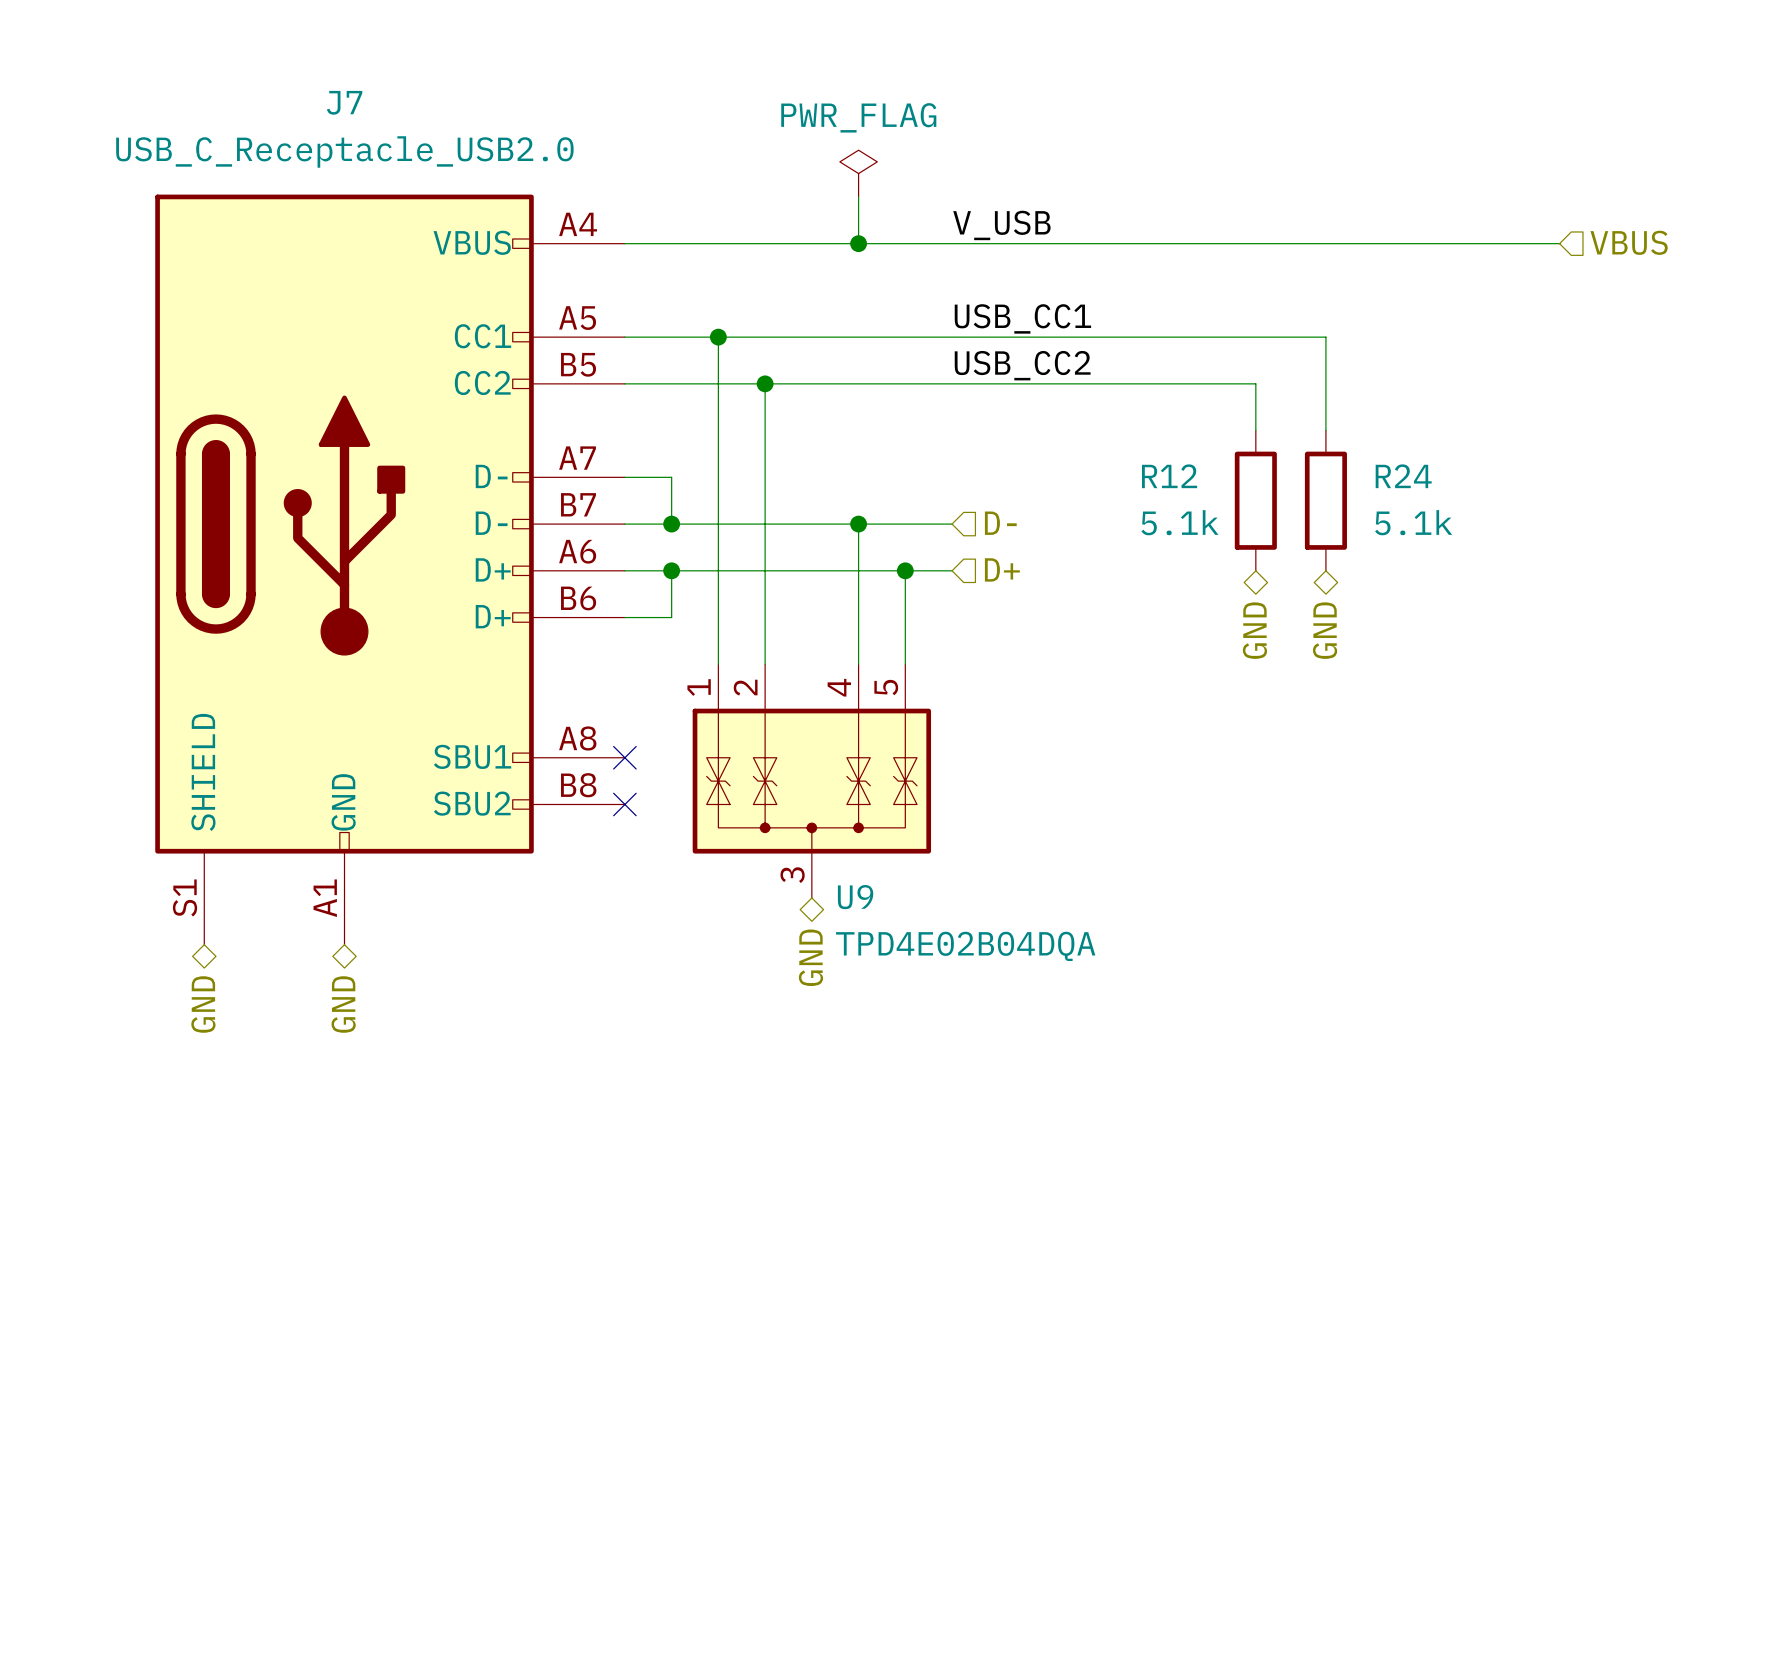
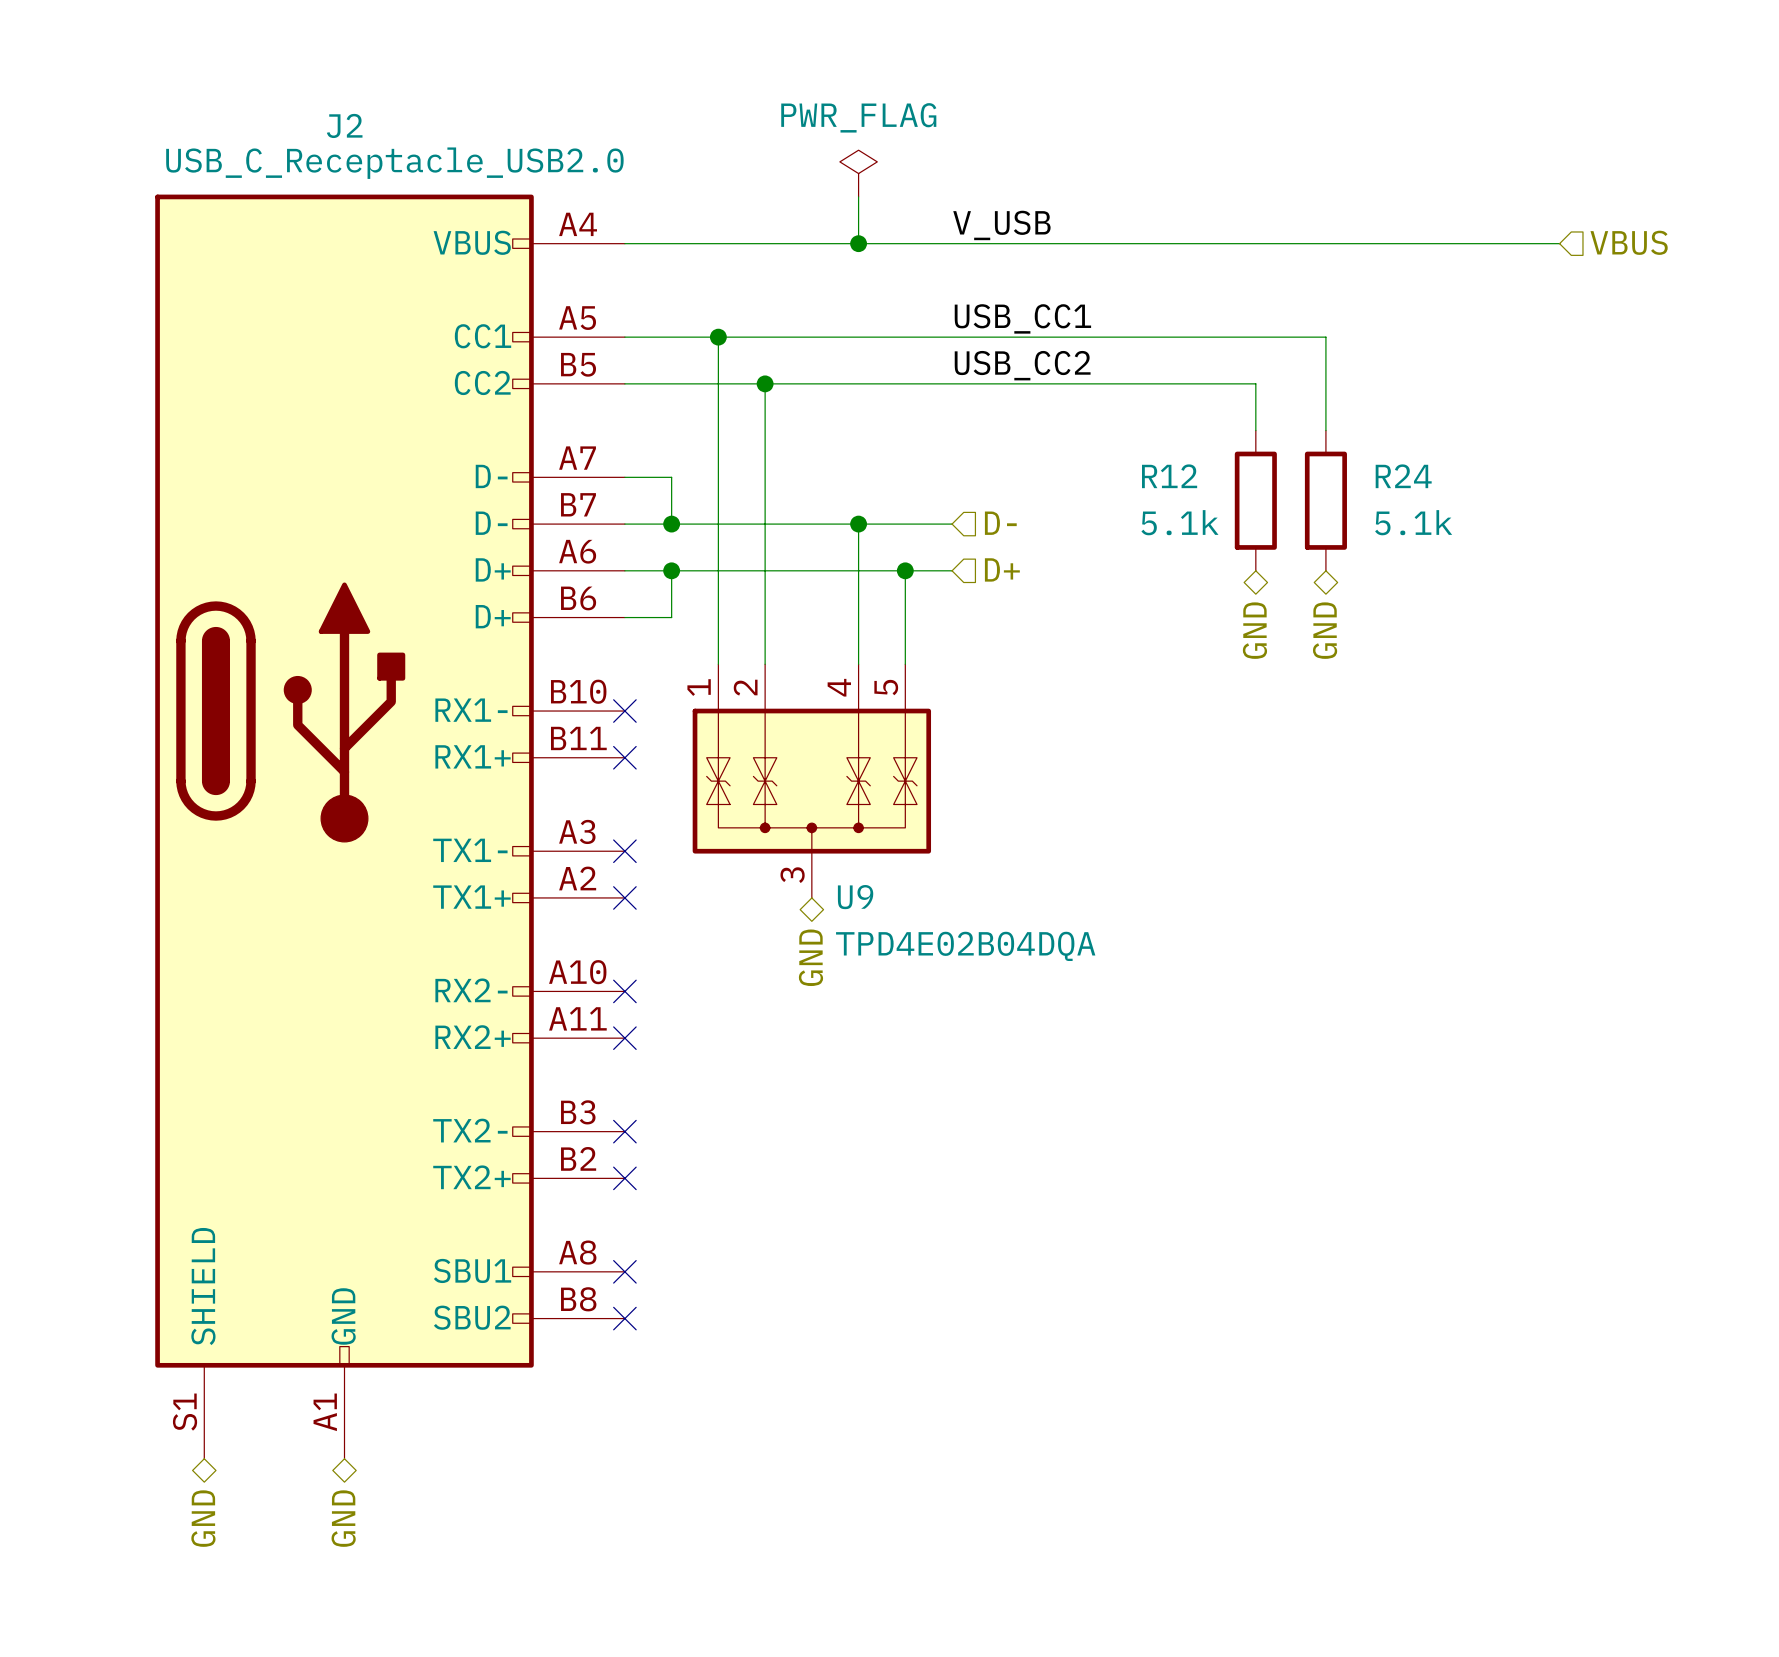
J7: USB_C_Receptacle_USB2.0 (390, 569) -> none
no-connect mark: none -> (624, 711)
no-connect mark: (624, 804) -> none
J2: none -> USB_C_Receptacle_USB2.0 (390, 826)
no-connect mark: none -> (624, 851)
no-connect mark: none -> (624, 897)
no-connect mark: none -> (624, 991)
hierarchical label: GND (203, 1004) -> none
hierarchical label: GND (343, 1004) -> none
no-connect mark: none -> (624, 1038)
no-connect mark: none -> (624, 1131)
no-connect mark: none -> (624, 1178)
no-connect mark: none -> (624, 1271)
no-connect mark: none -> (624, 1318)
hierarchical label: none -> GND (203, 1518)
hierarchical label: none -> GND (343, 1518)

